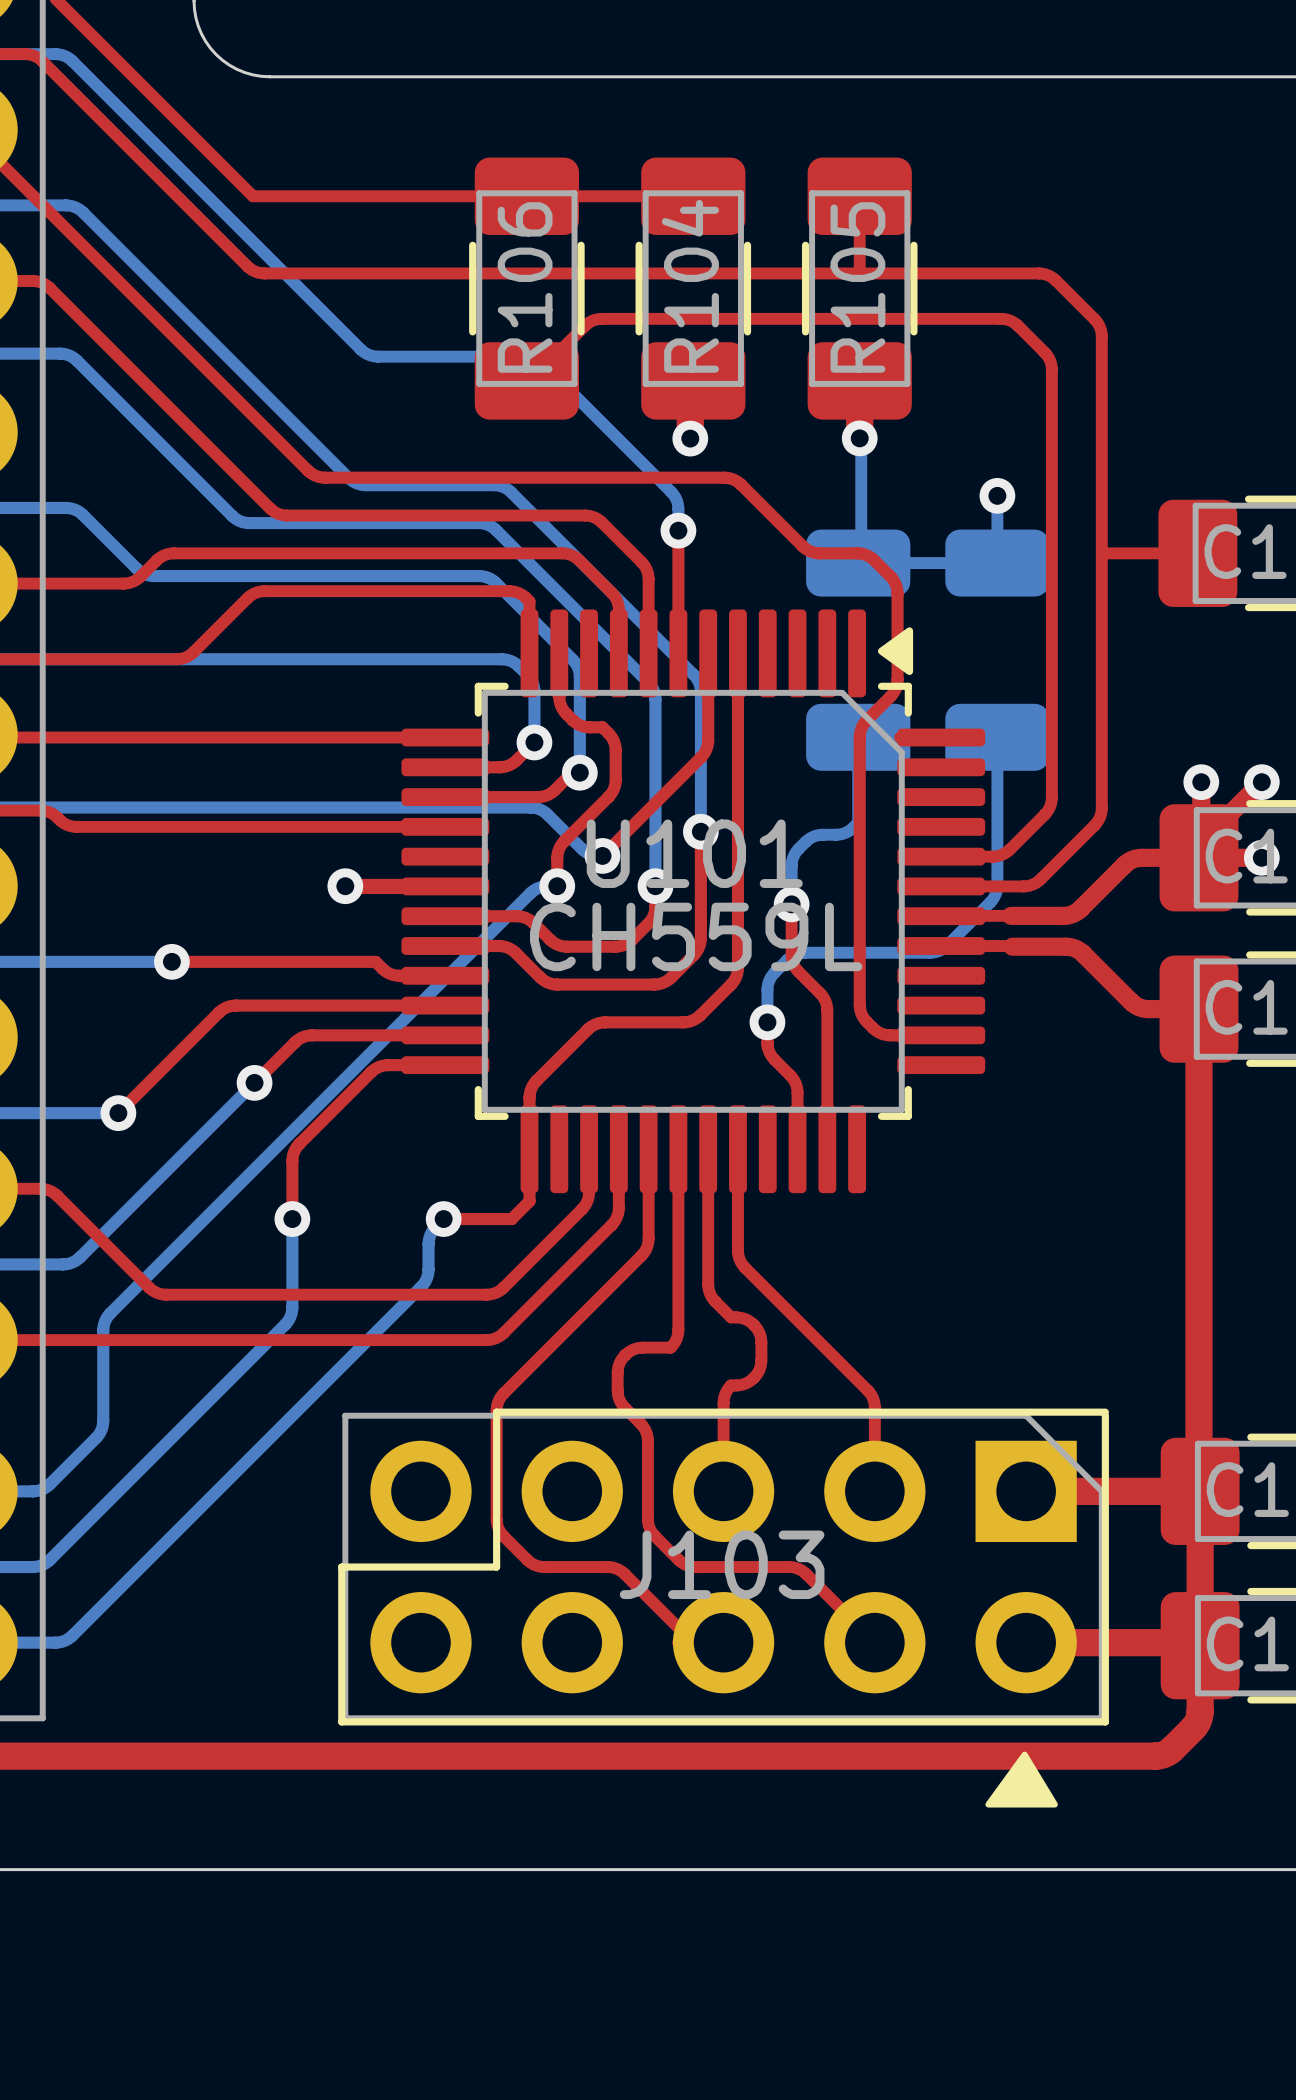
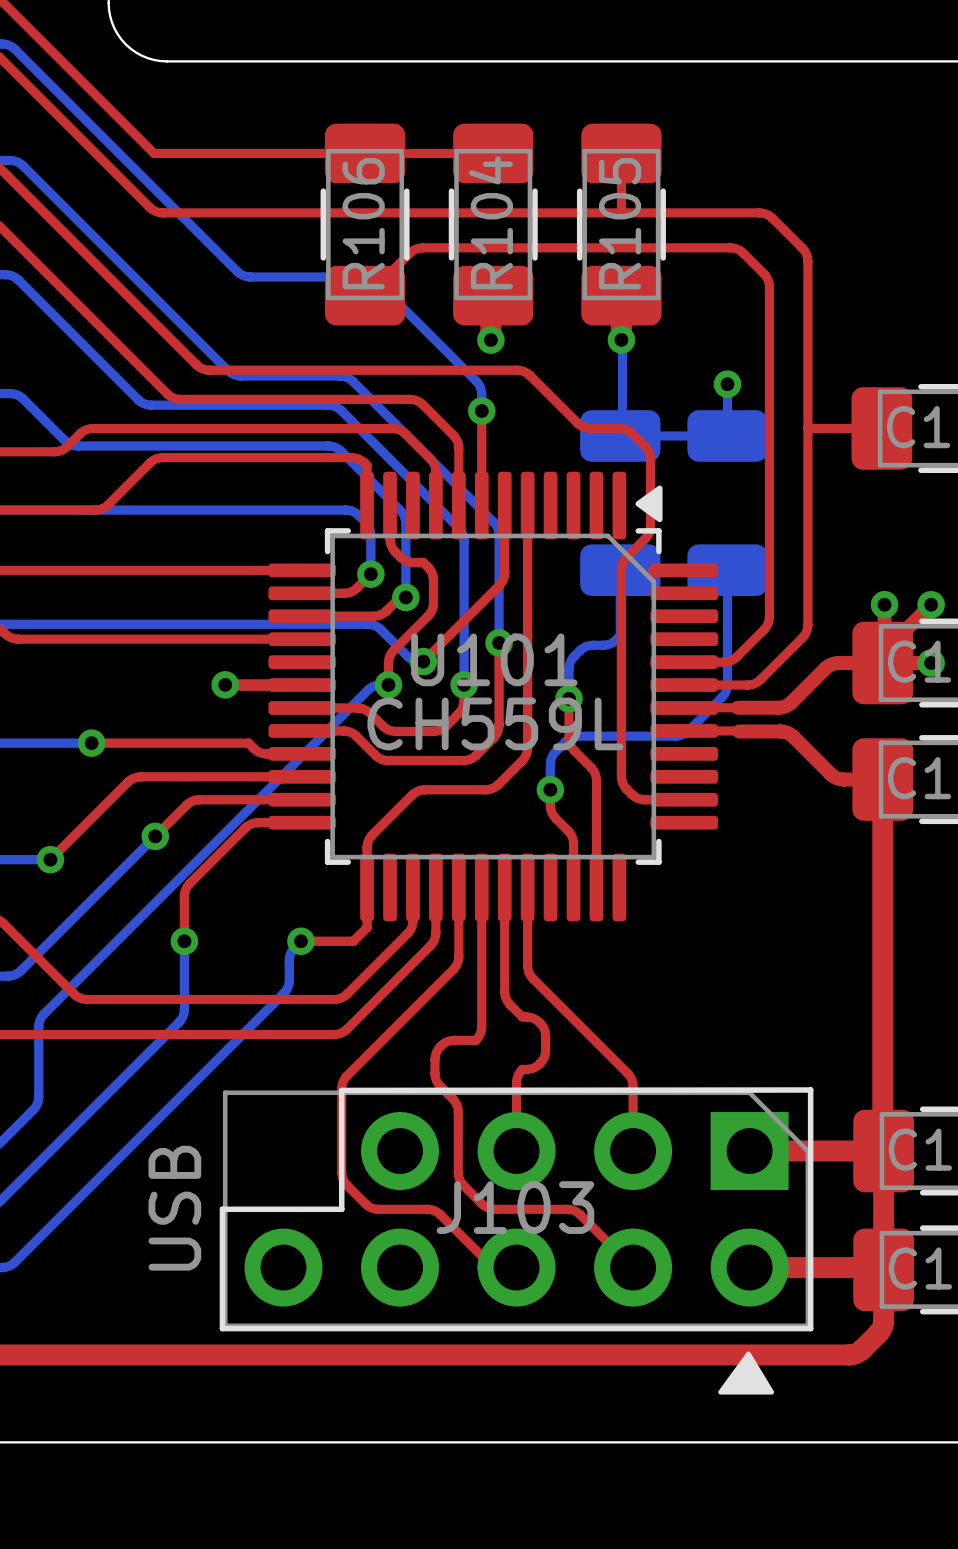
J103 footprint: [338, 1408, 1109, 1726] -> [219, 1087, 814, 1332]
J103 value: none -> USB (174, 1208)

